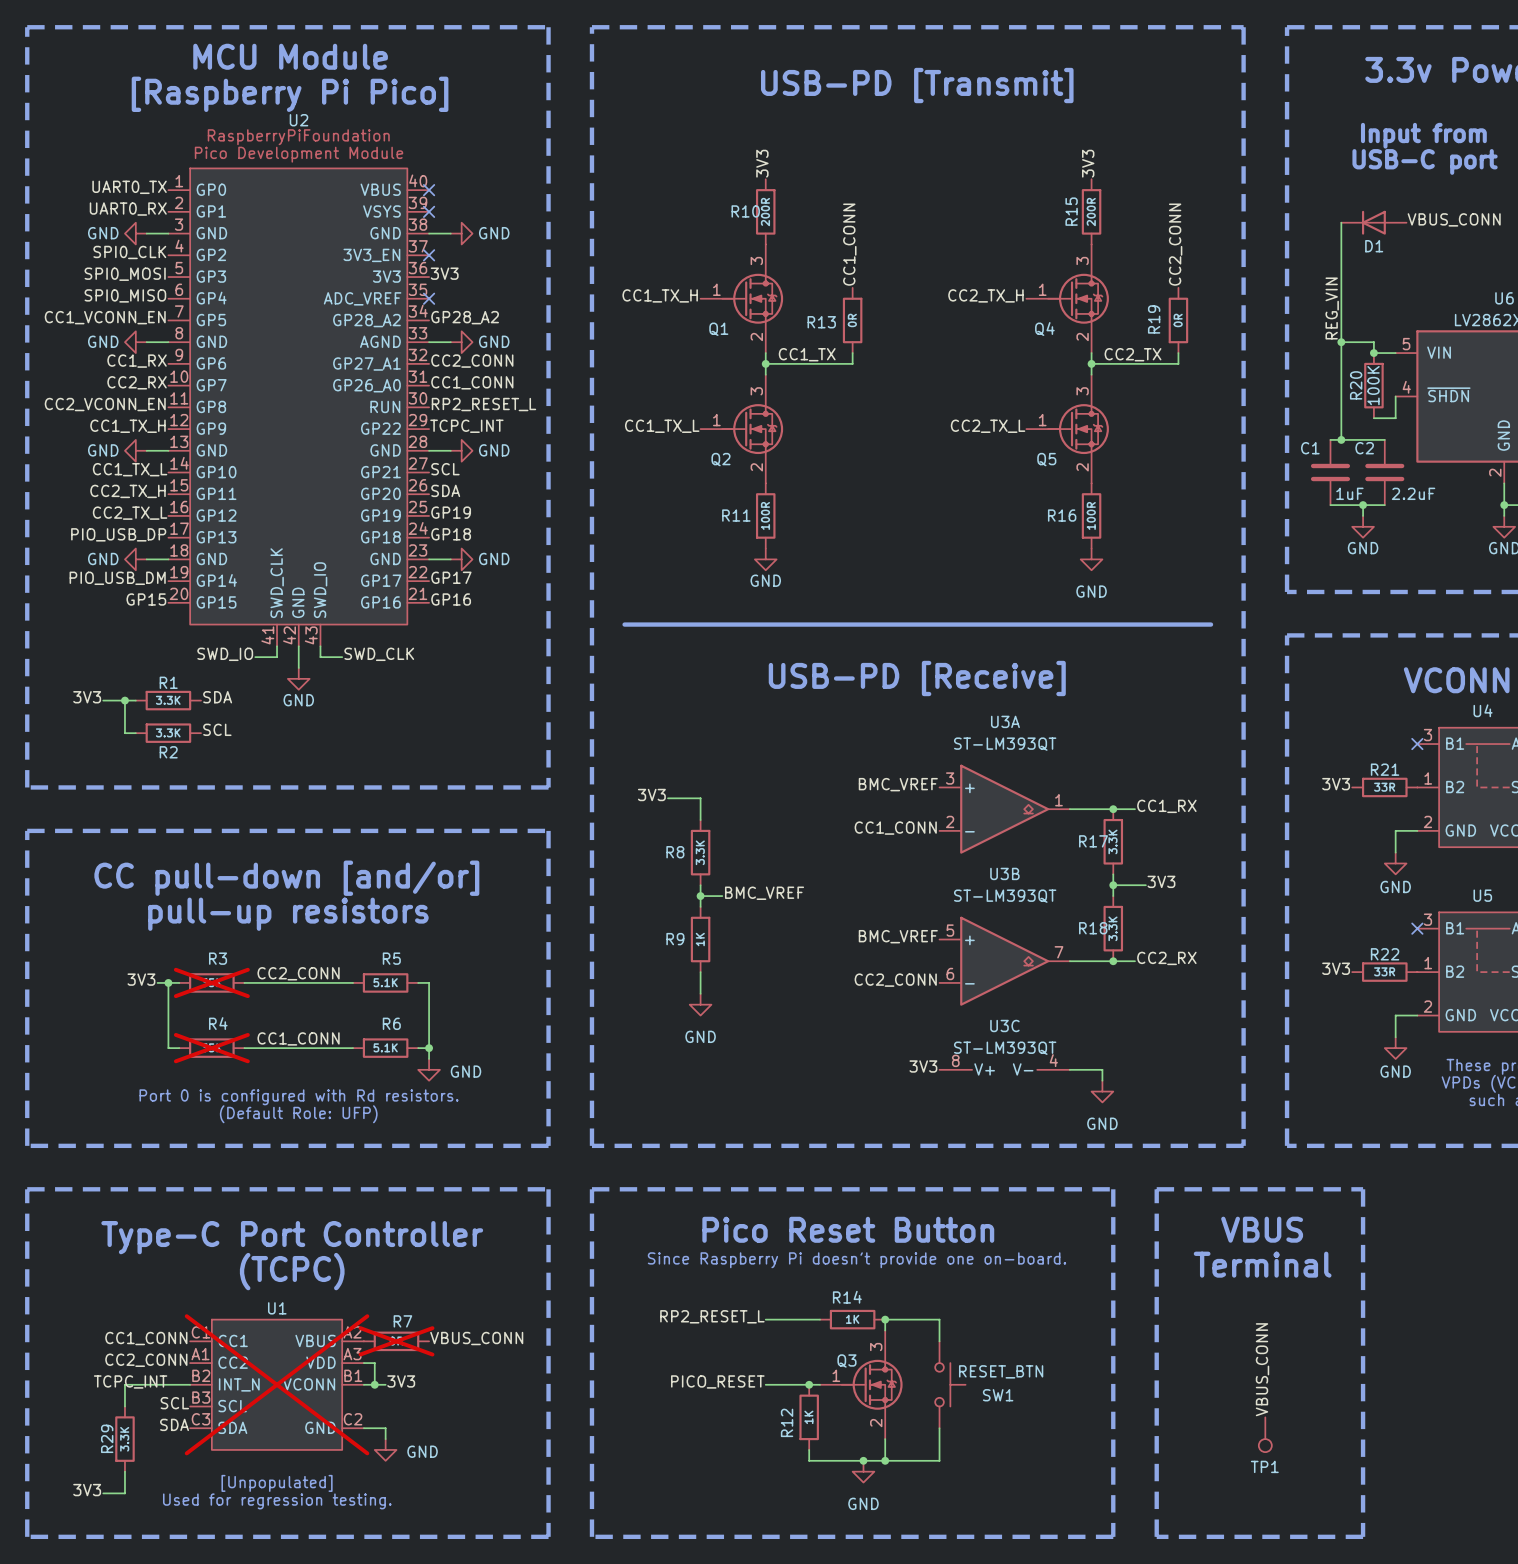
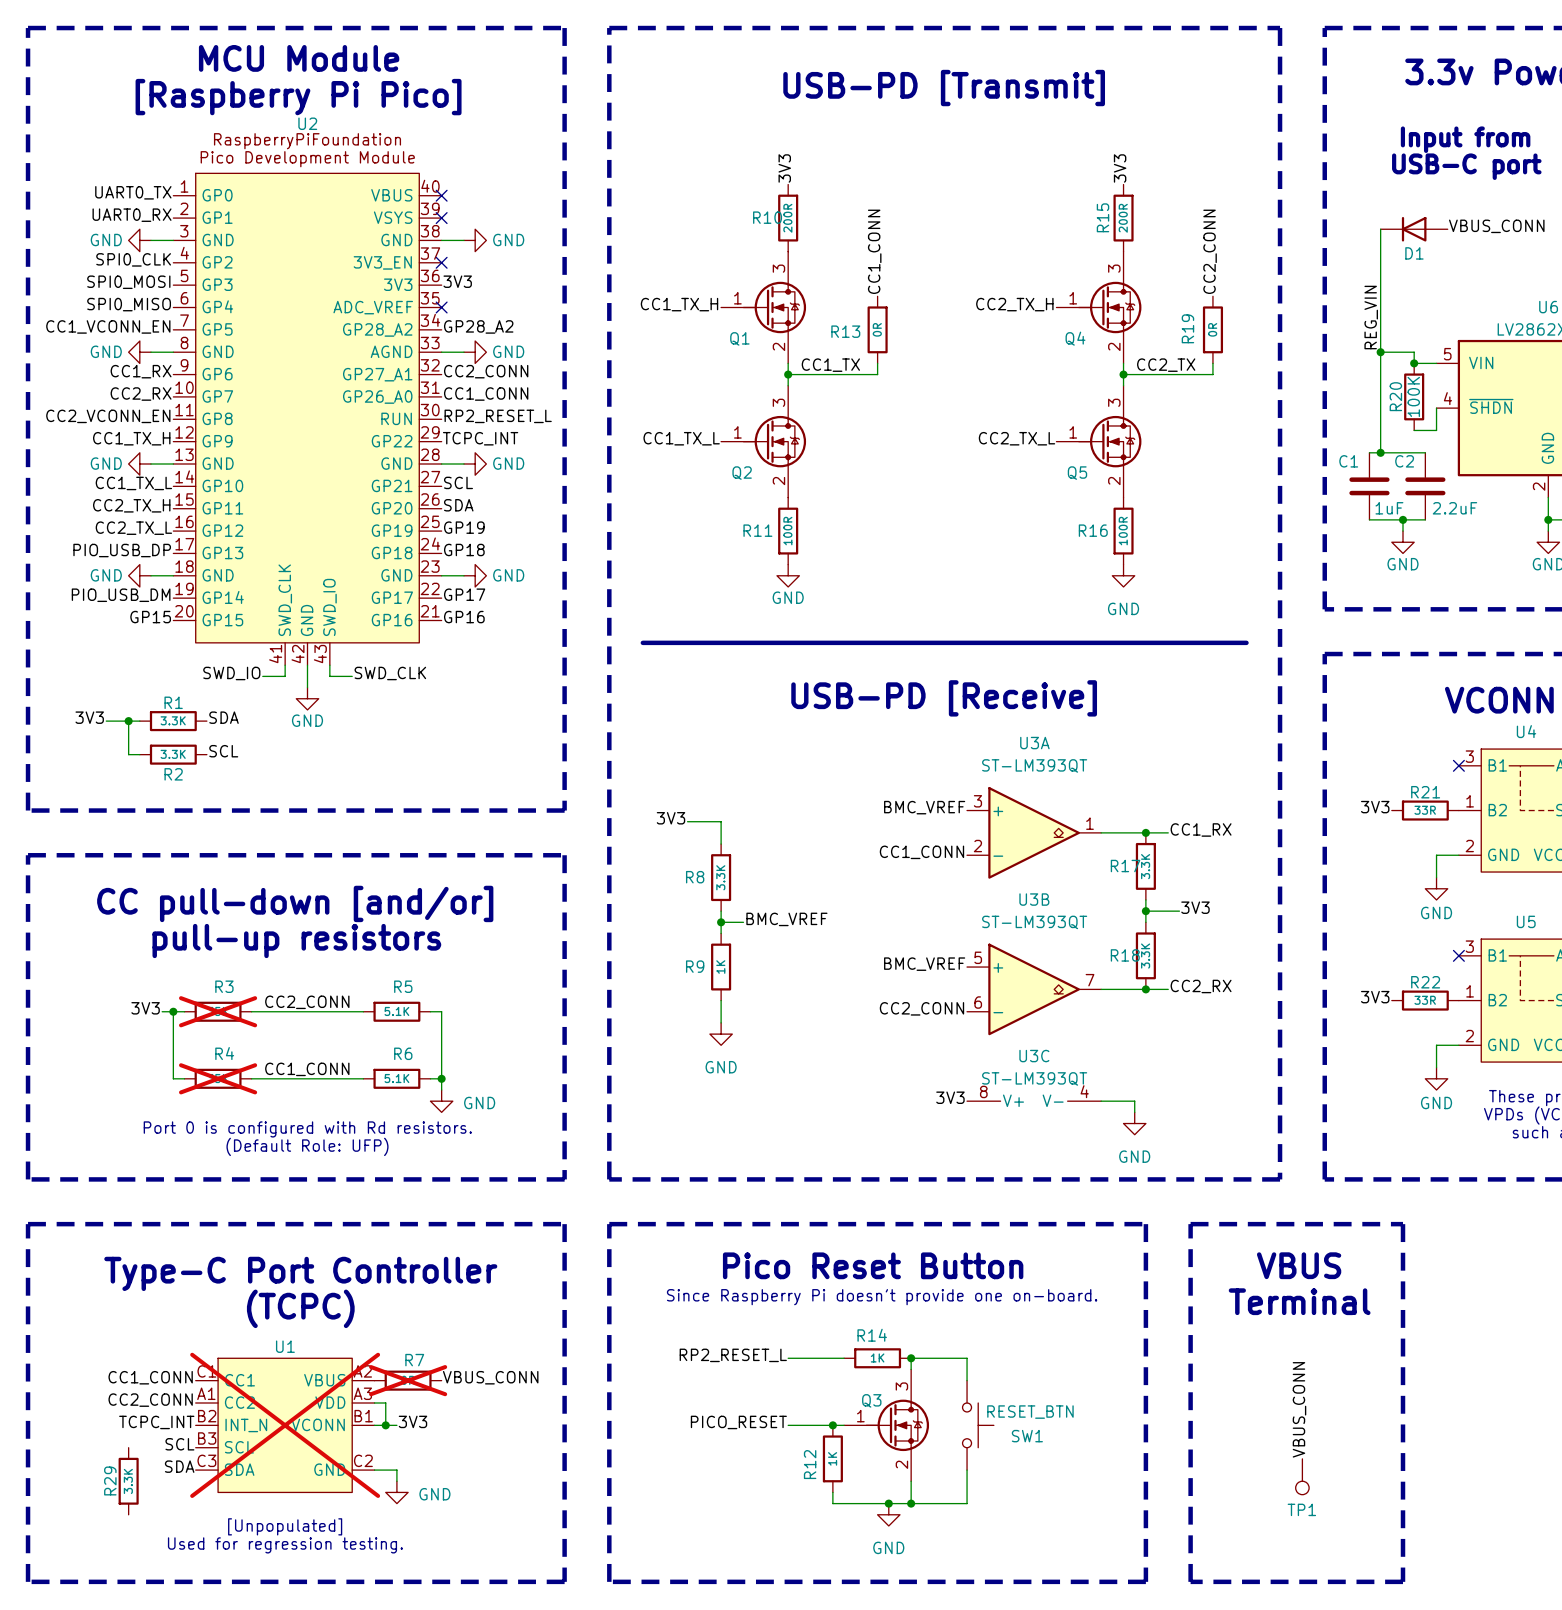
label position: TCPC_INT (130, 1381) -> TCPC_INT (156, 1422)
wire: (190, 1384) (124, 1384) (124, 1406) -> none
wire: (124, 1471) (124, 1493) (103, 1493) -> none
label: 3V3 (87, 1490) -> none

